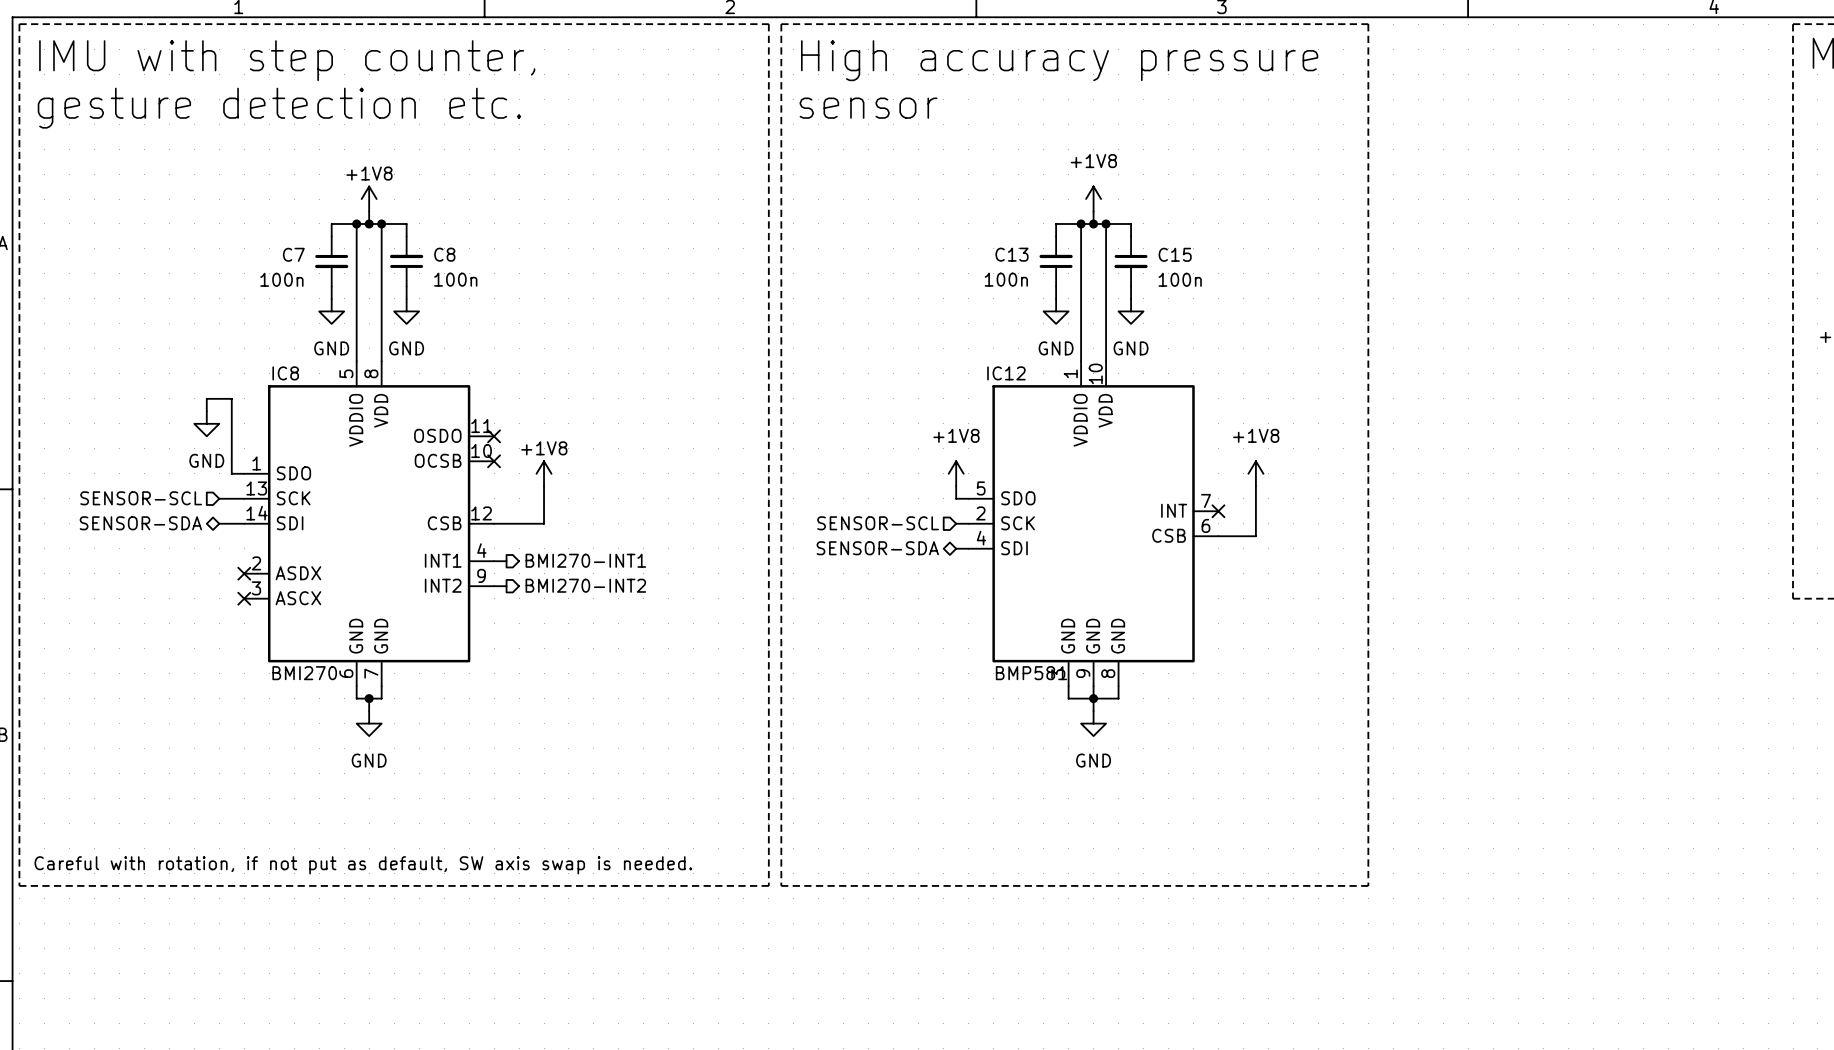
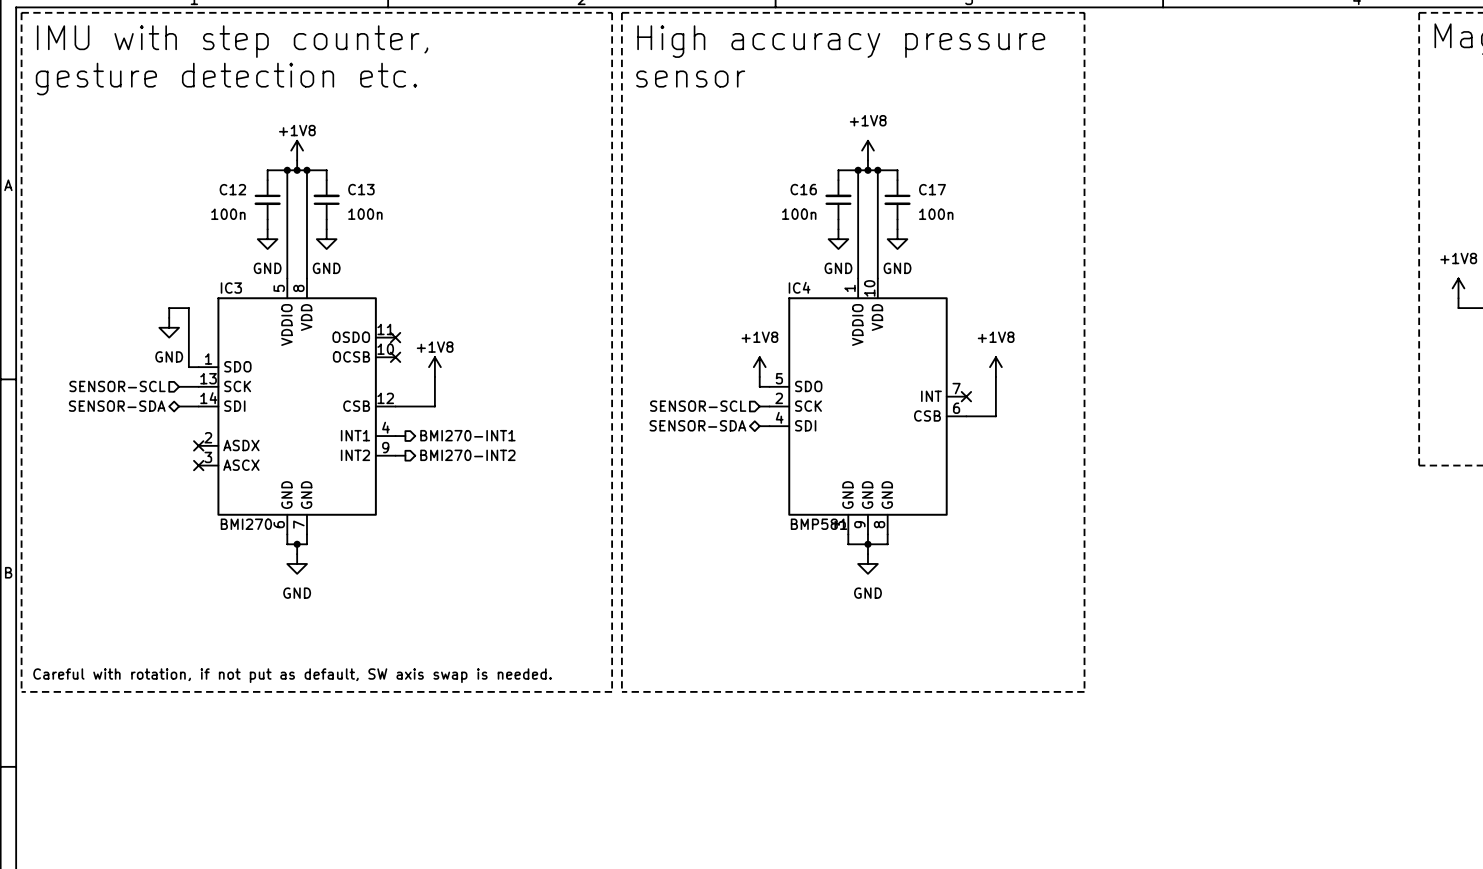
C7 name: C7 (293, 254) -> C12 (232, 189)
C8 name: C8 (444, 254) -> C13 (361, 189)
C13 name: C13 (1011, 254) -> C16 (803, 189)
C15 name: C15 (1175, 254) -> C17 (932, 189)
IC8 name: IC8 (285, 373) -> IC3 (231, 288)
IC12 name: IC12 (1006, 373) -> IC4 (799, 287)

